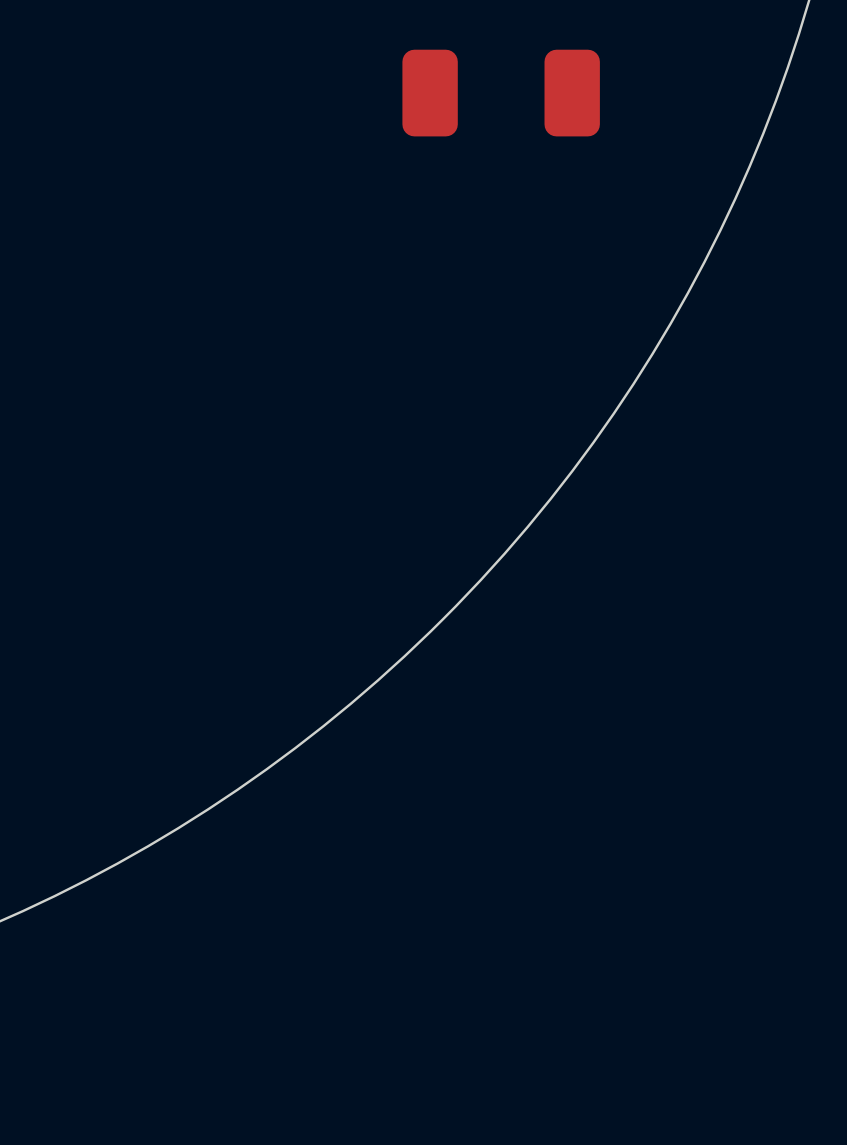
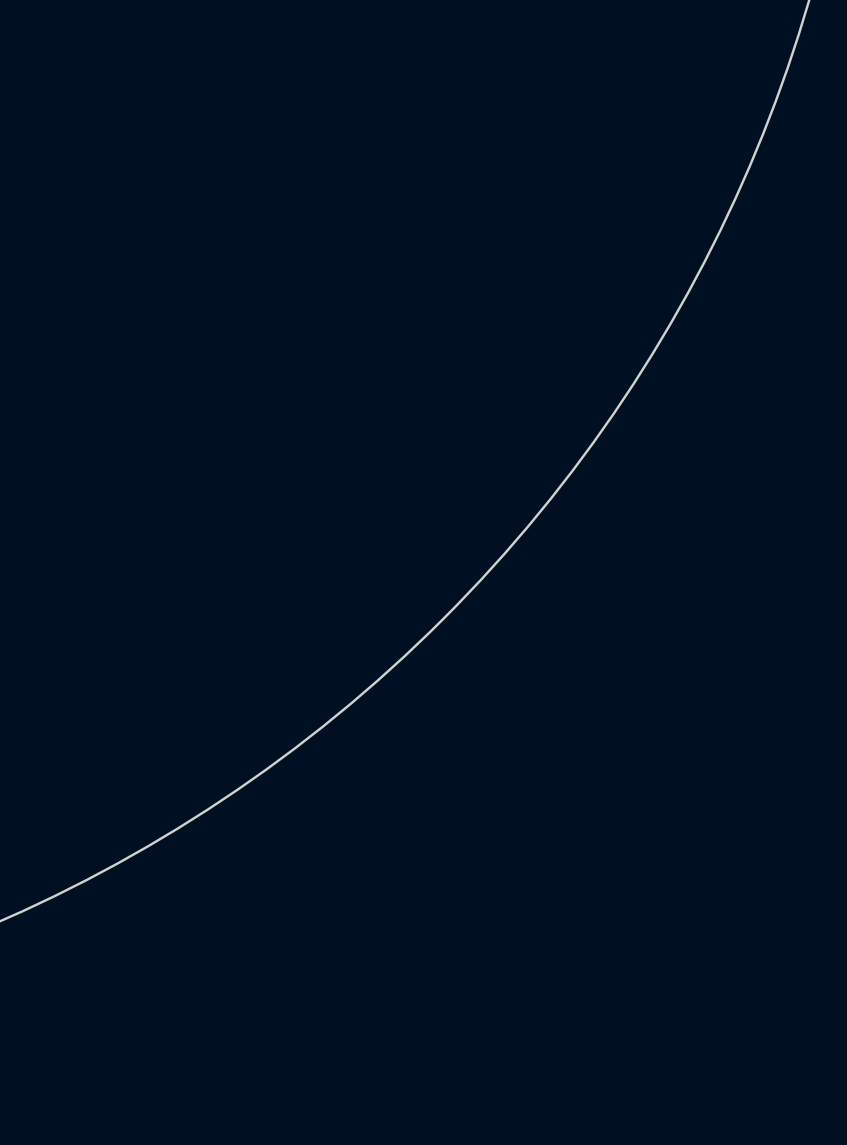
part: (501, 93) -> none

